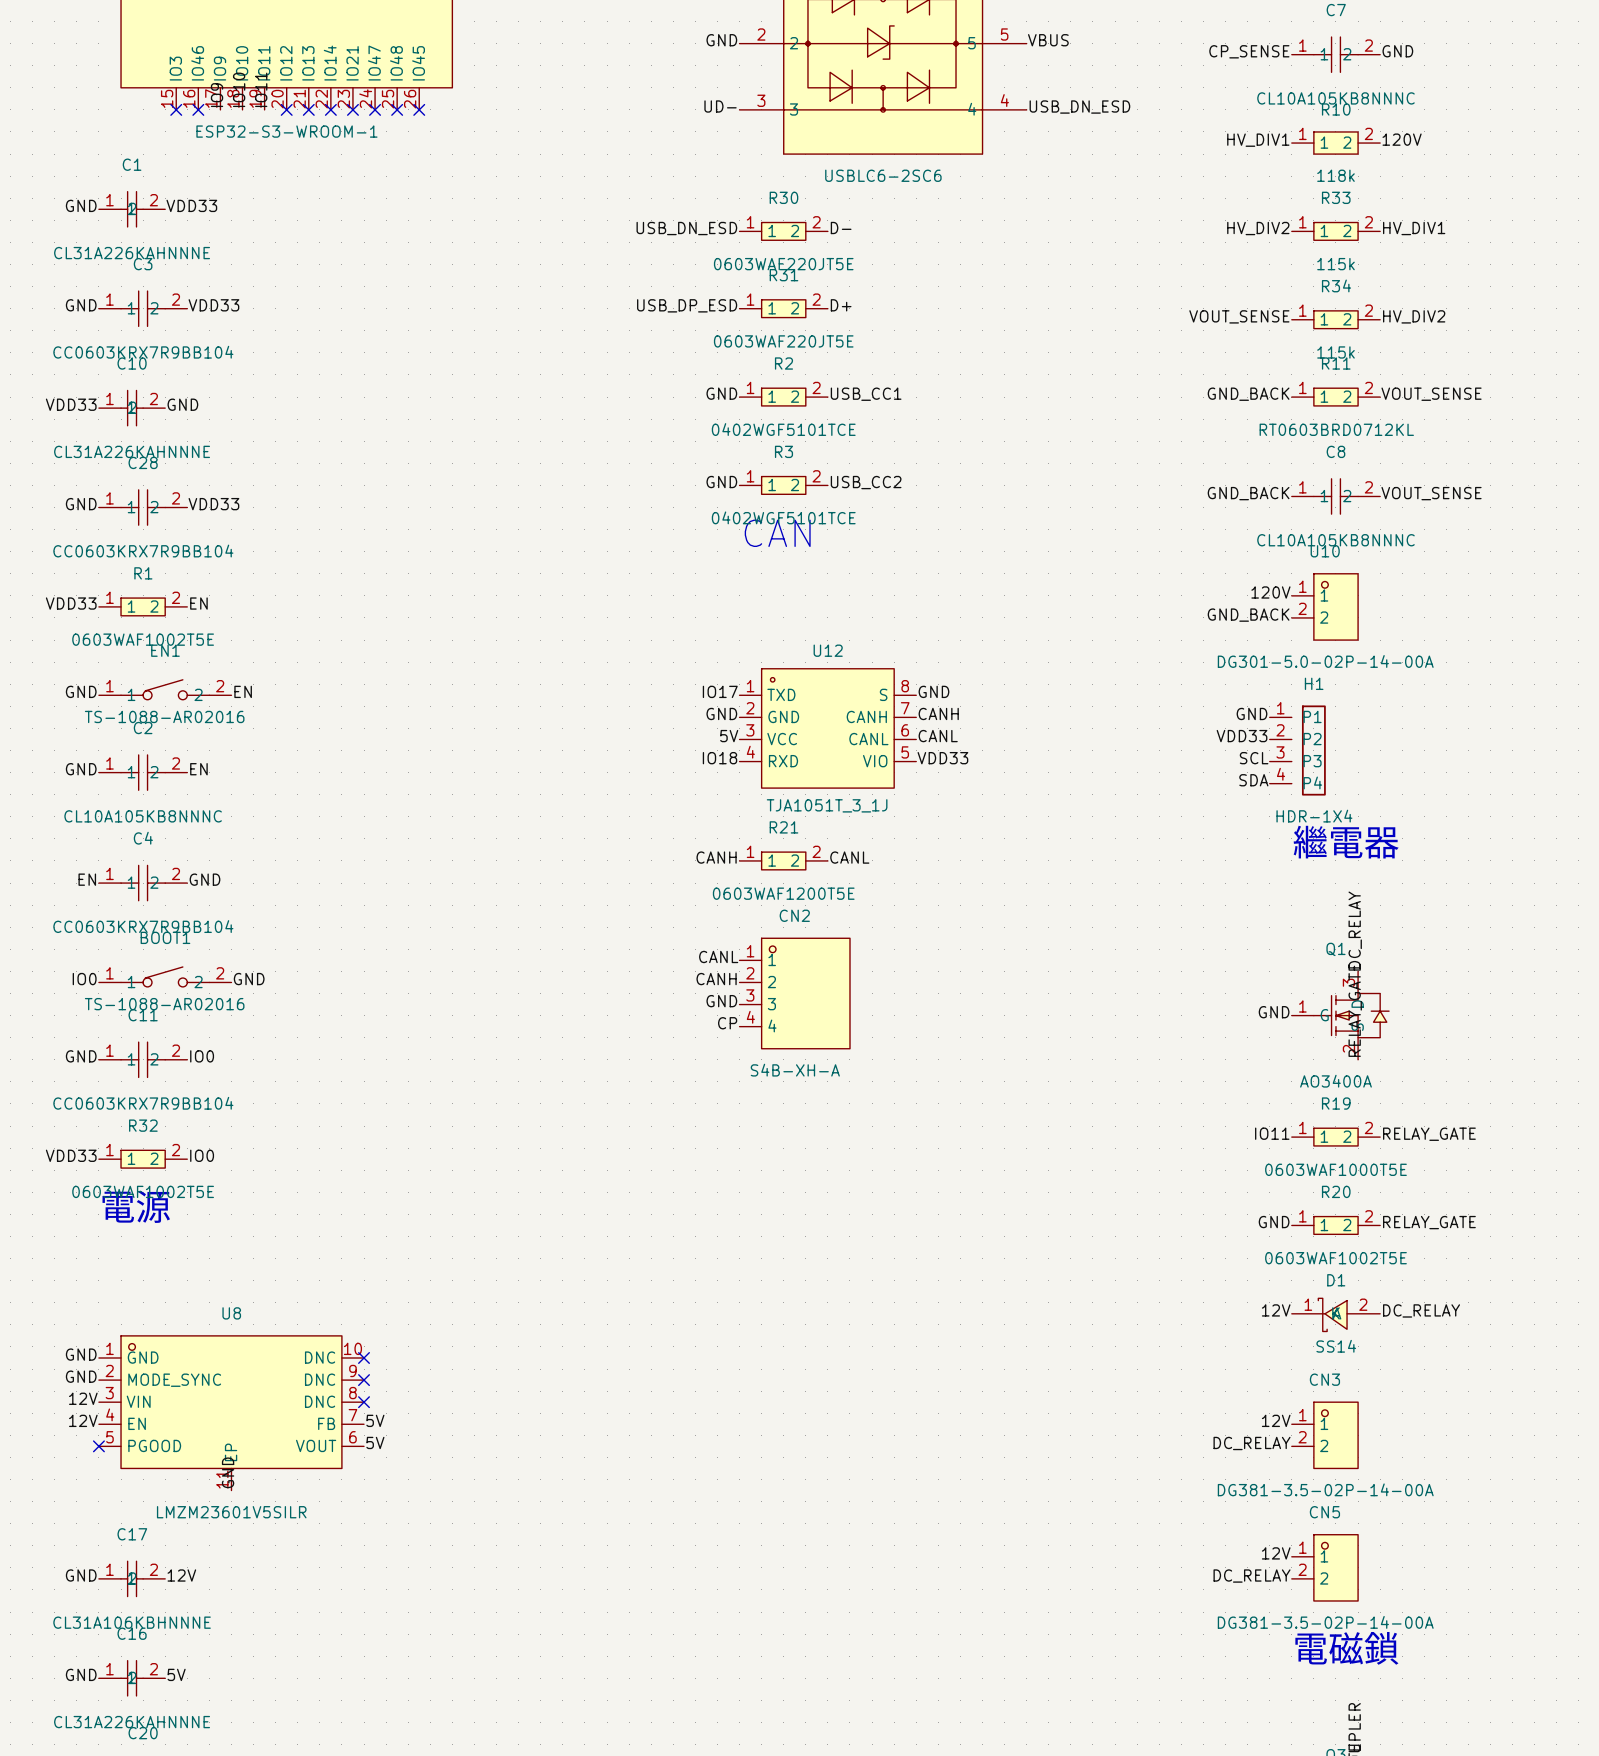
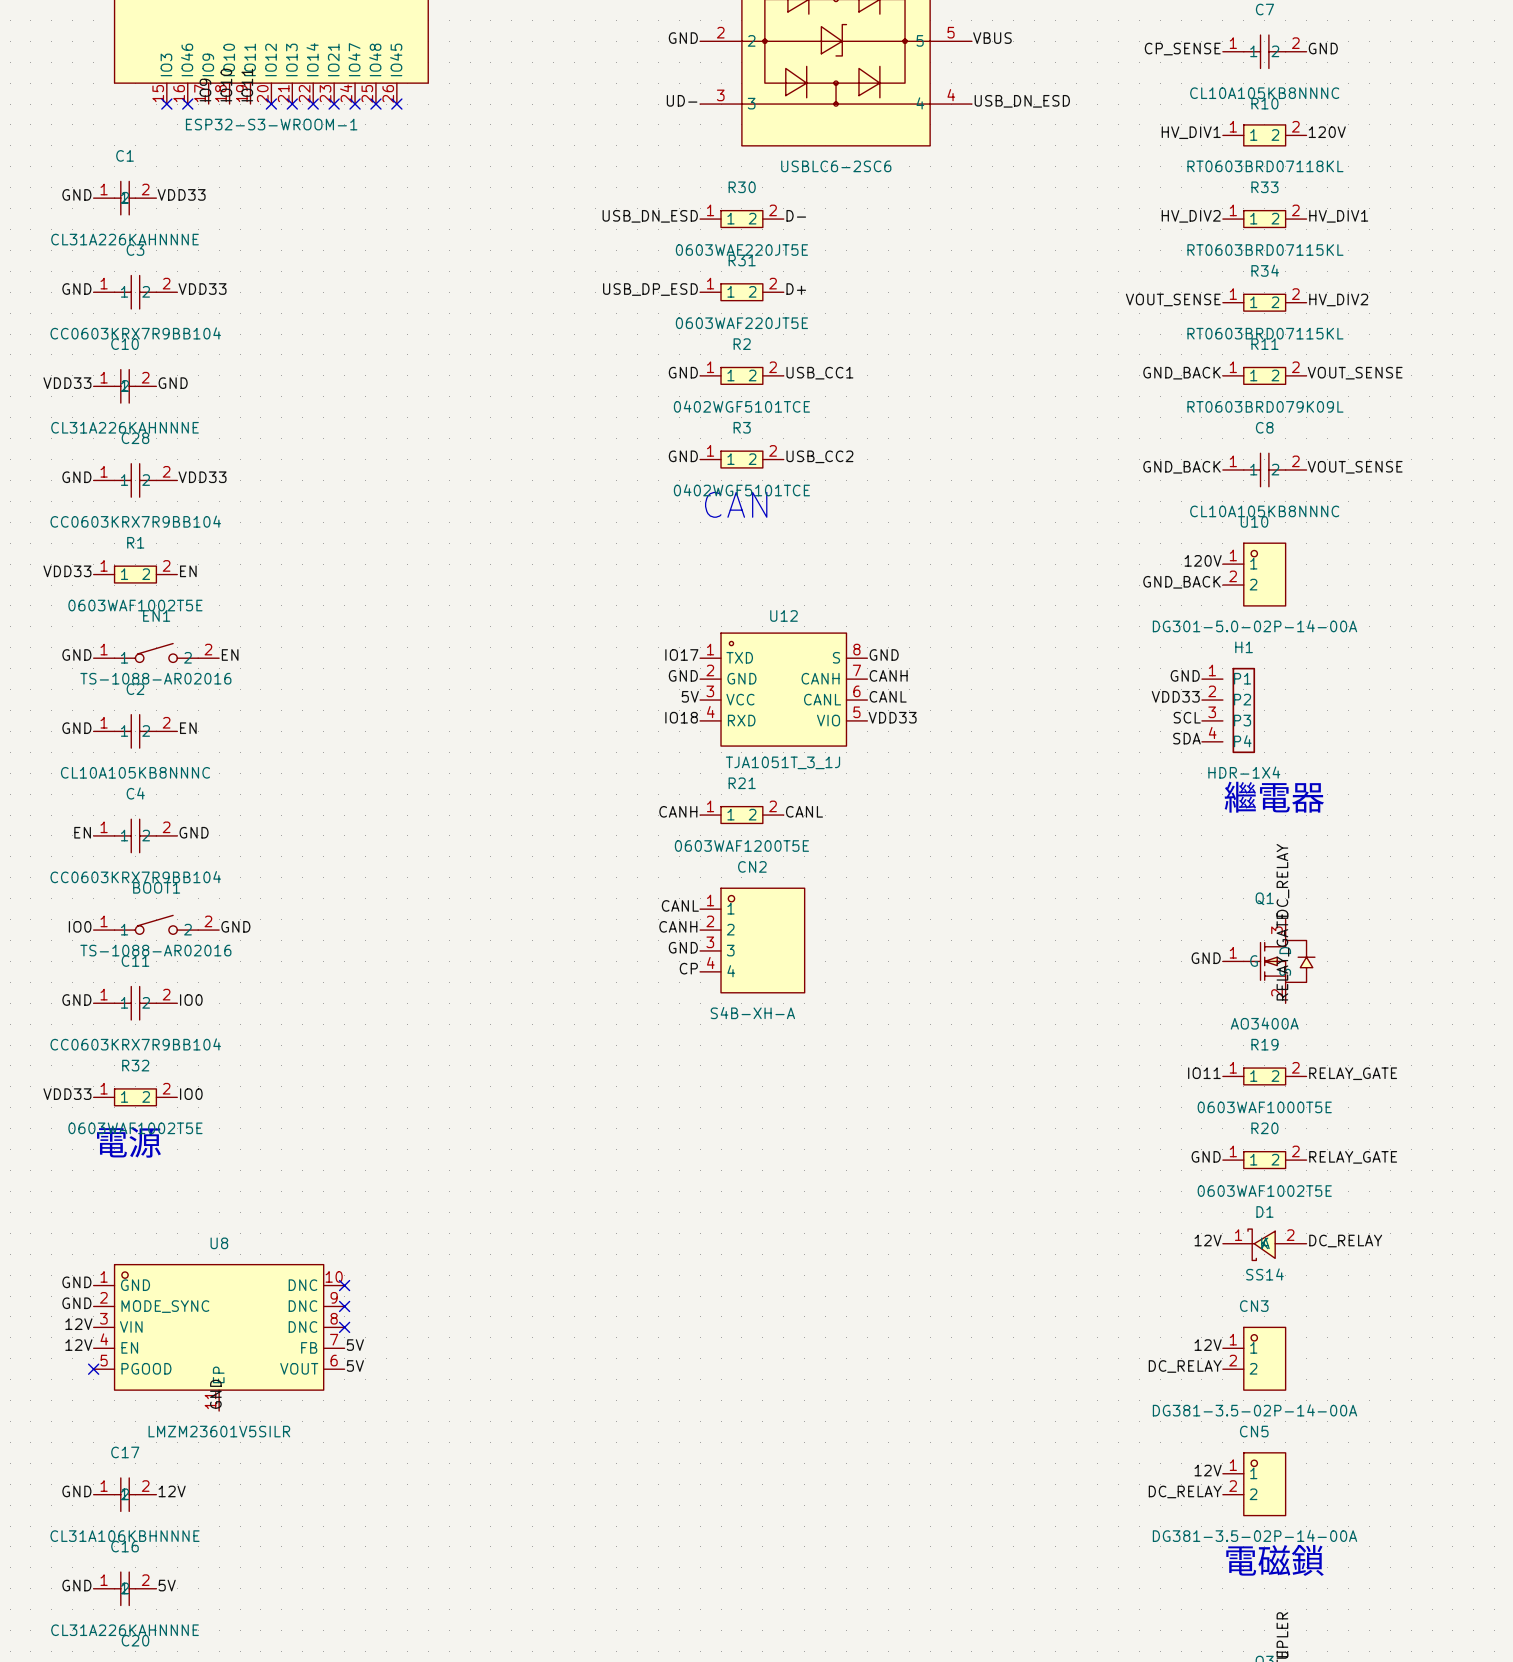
R10 value: 118k (1335, 175) -> RT0603BRD07118KL (1265, 166)
R33 value: 115k (1335, 264) -> RT0603BRD07115KL (1265, 250)
R34 value: 115k (1335, 352) -> RT0603BRD07115KL (1265, 333)
R11 value: RT0603BRD0712KL (1336, 429) -> RT0603BRD079K09L (1265, 406)

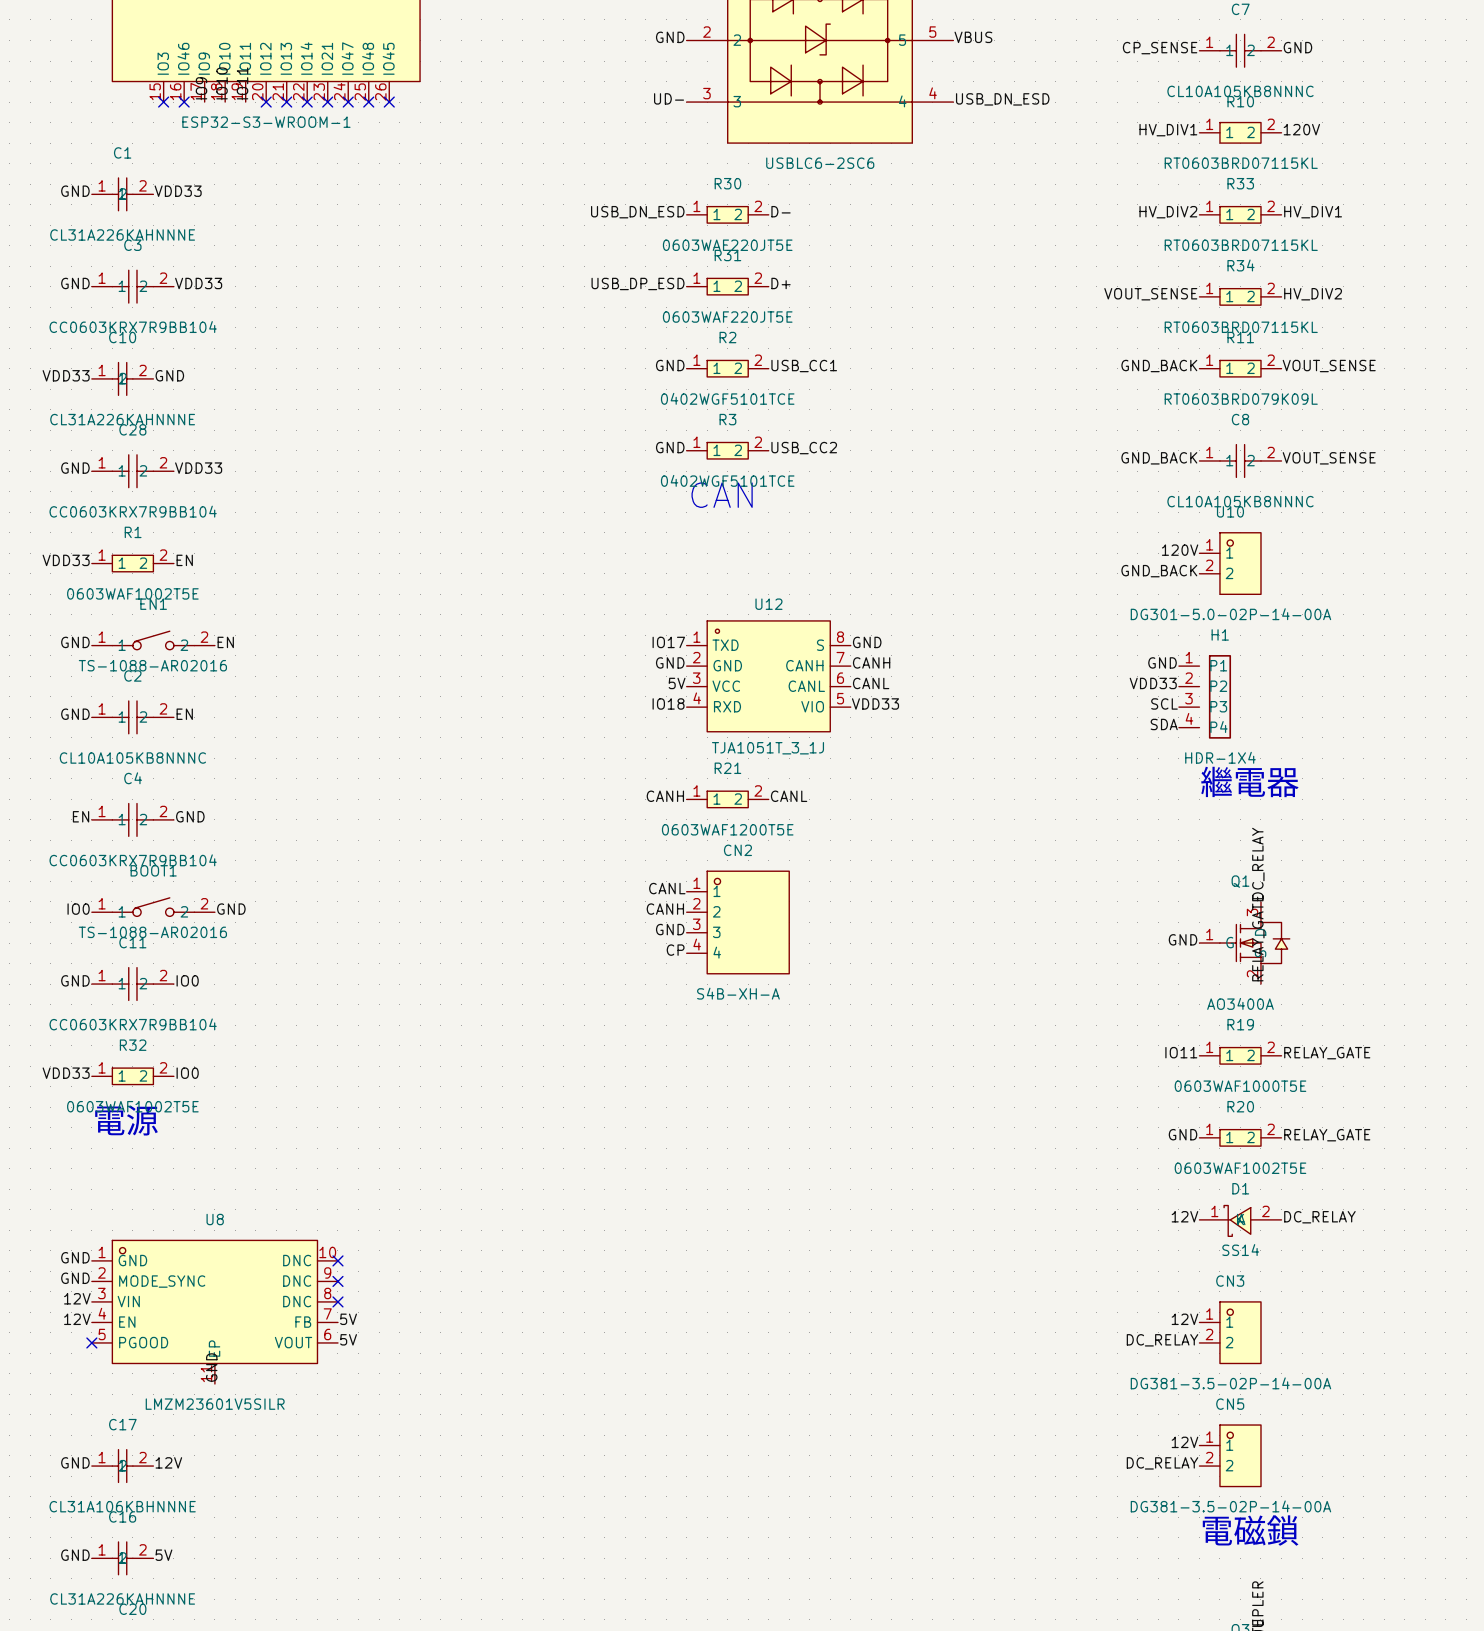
R10 value: RT0603BRD07118KL (1265, 166) -> RT0603BRD07115KL (1241, 163)

